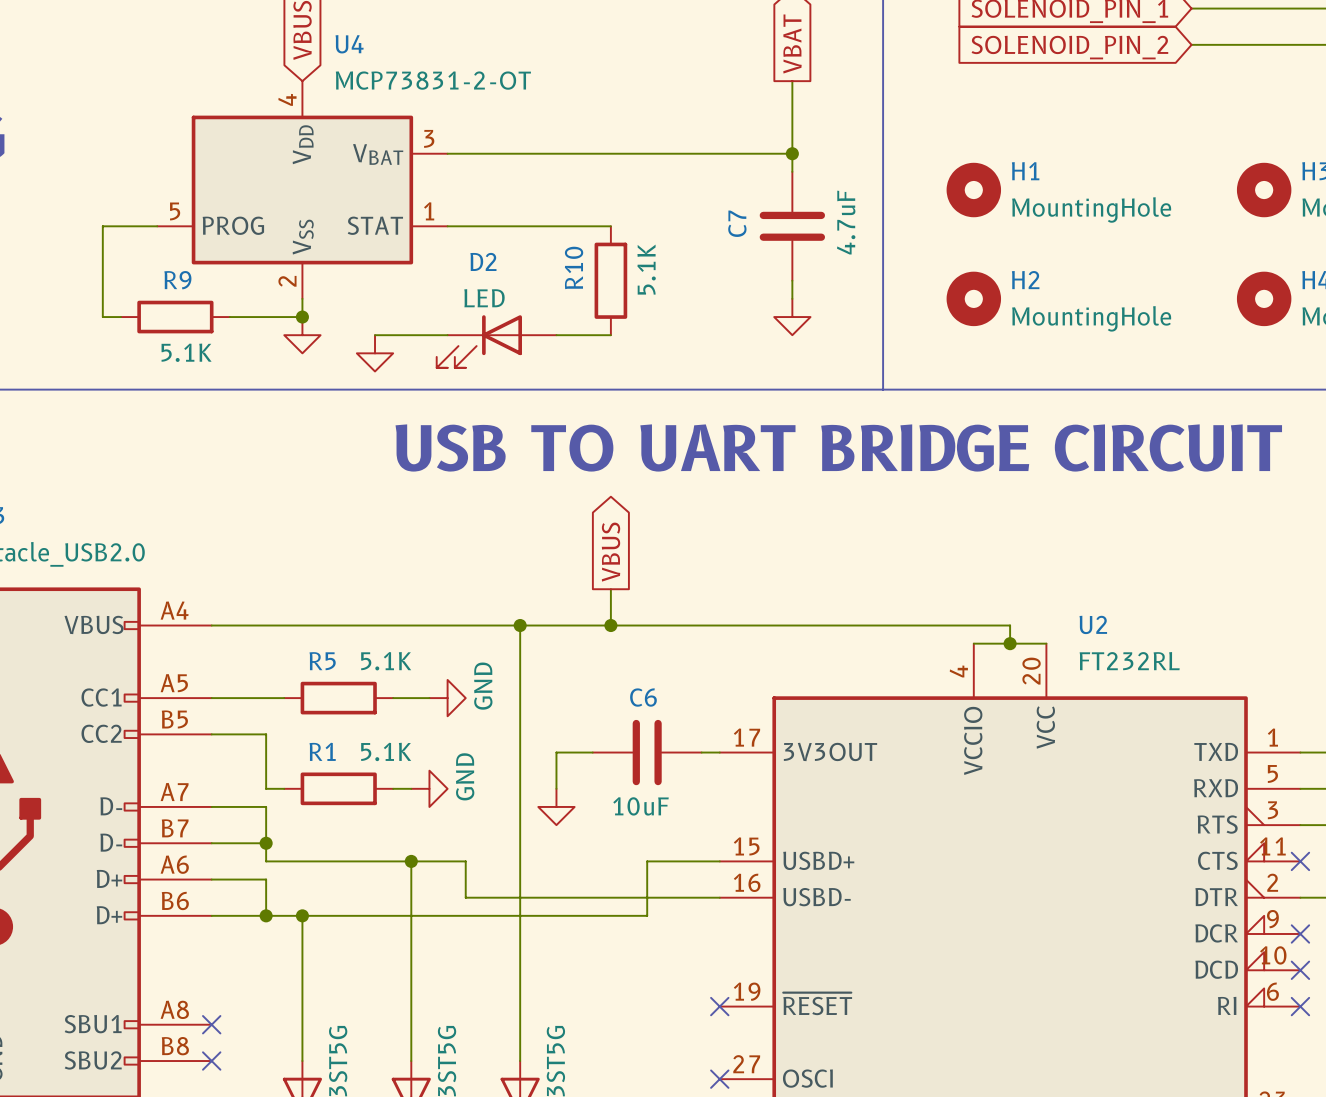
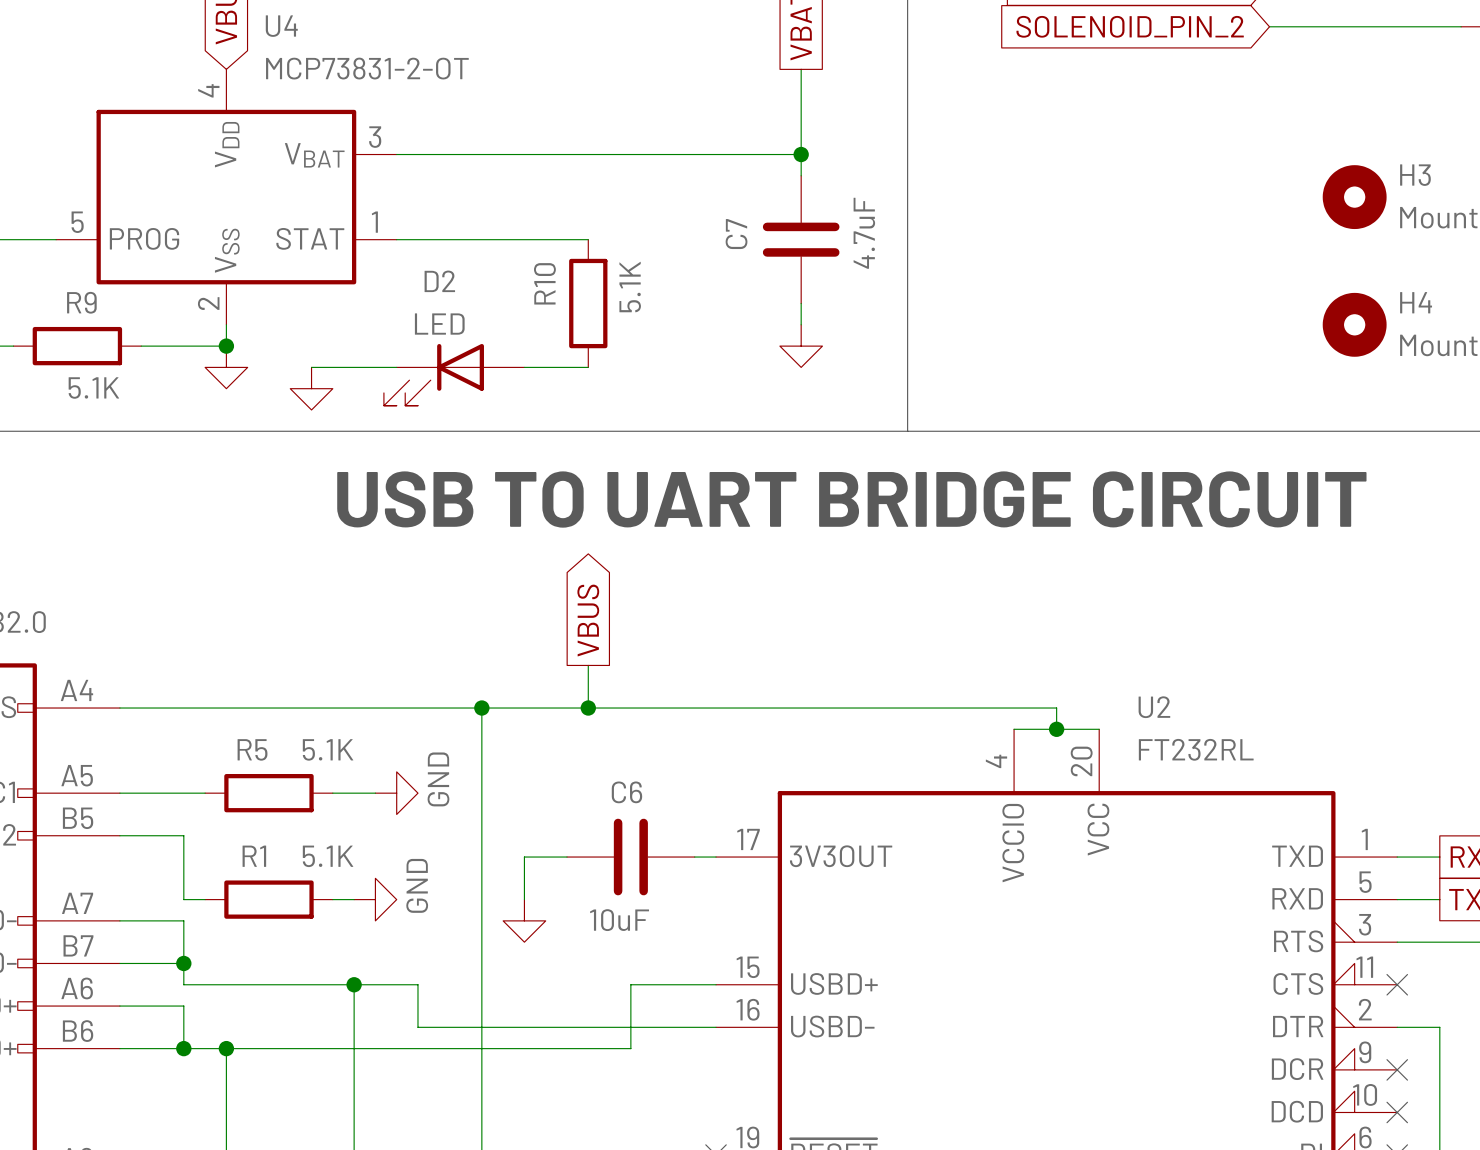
H1: MountingHole (973, 190) -> none
H2: MountingHole (973, 298) -> none

